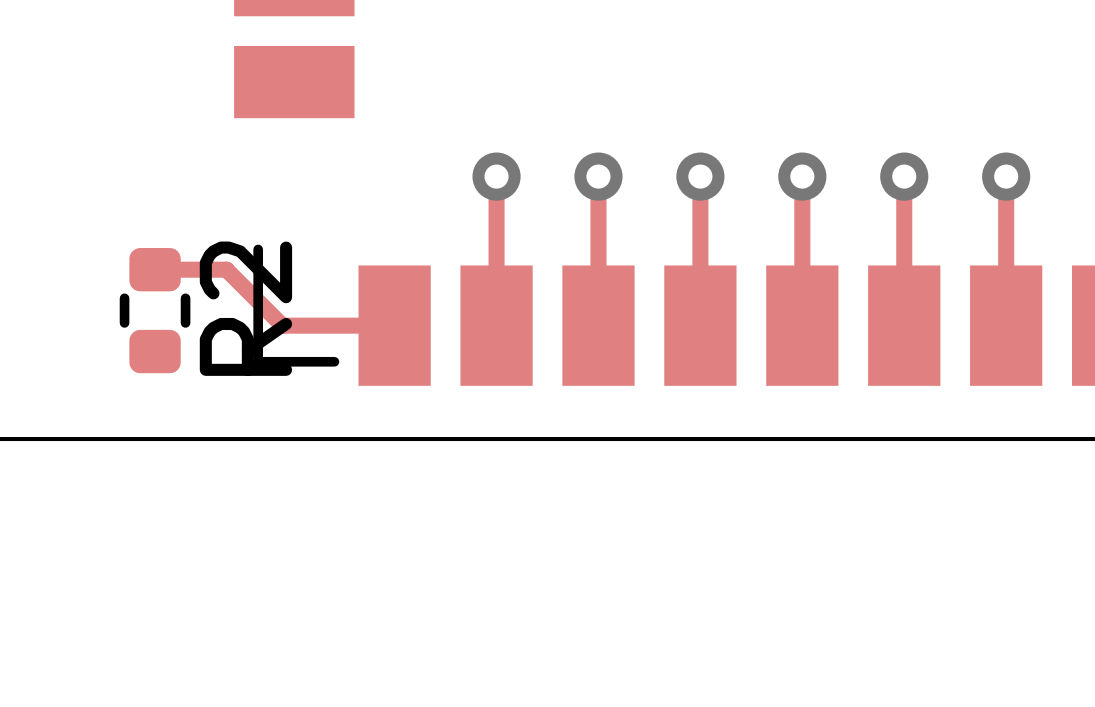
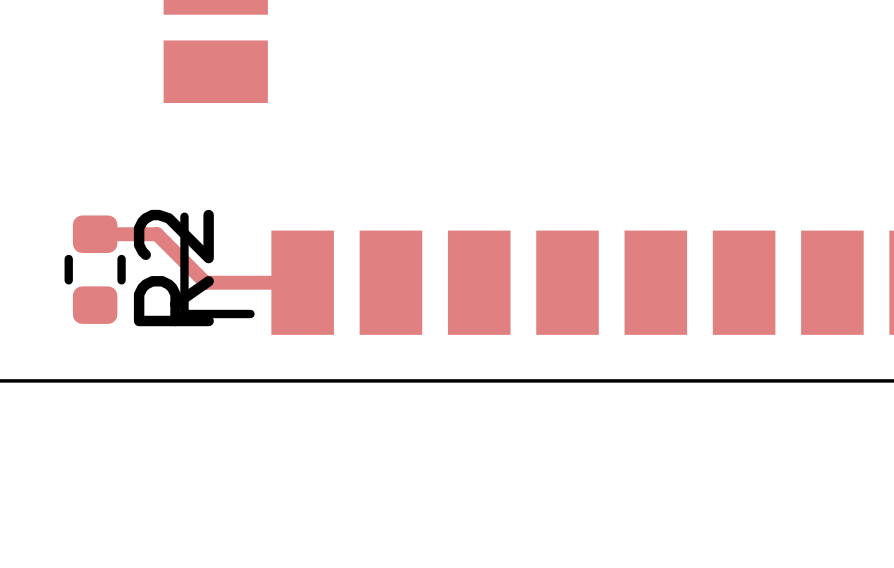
top track: (496, 176) (496, 325) -> none
via: (496, 176) -> none
top track: (598, 176) (598, 325) -> none
via: (598, 176) -> none
top track: (700, 176) (700, 325) -> none
via: (700, 176) -> none
top track: (802, 176) (802, 325) -> none
via: (802, 176) -> none
top track: (904, 176) (904, 325) -> none
via: (904, 176) -> none
top track: (1006, 176) (1006, 325) -> none
via: (1006, 176) -> none

